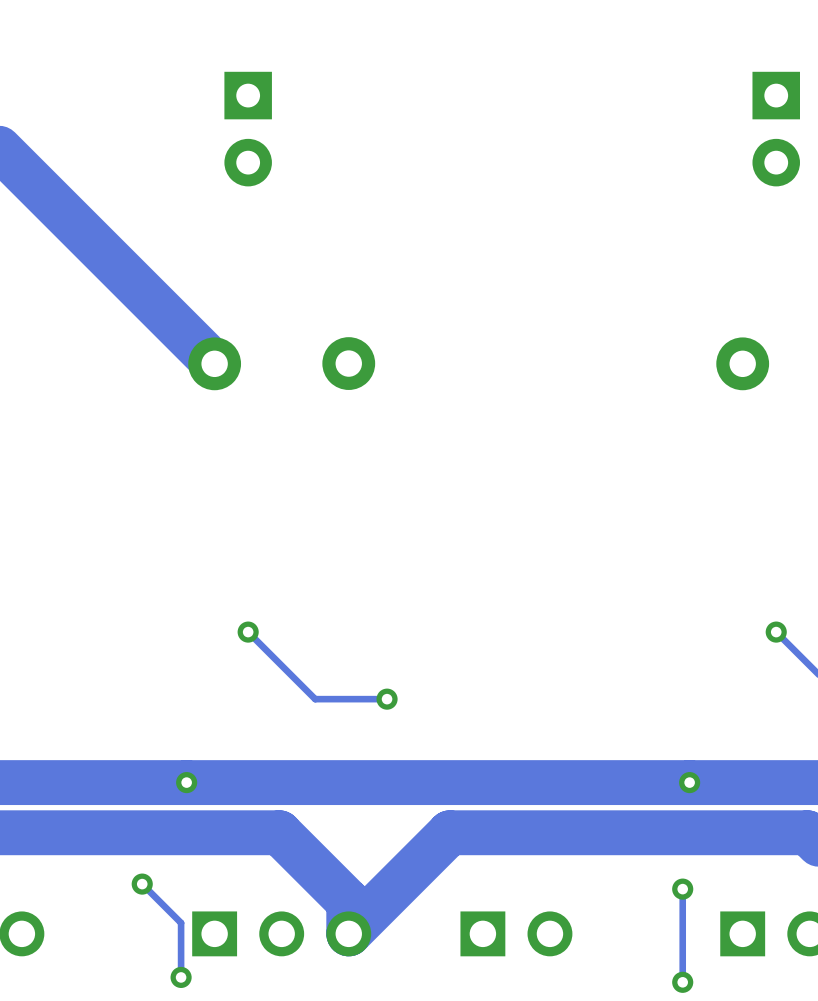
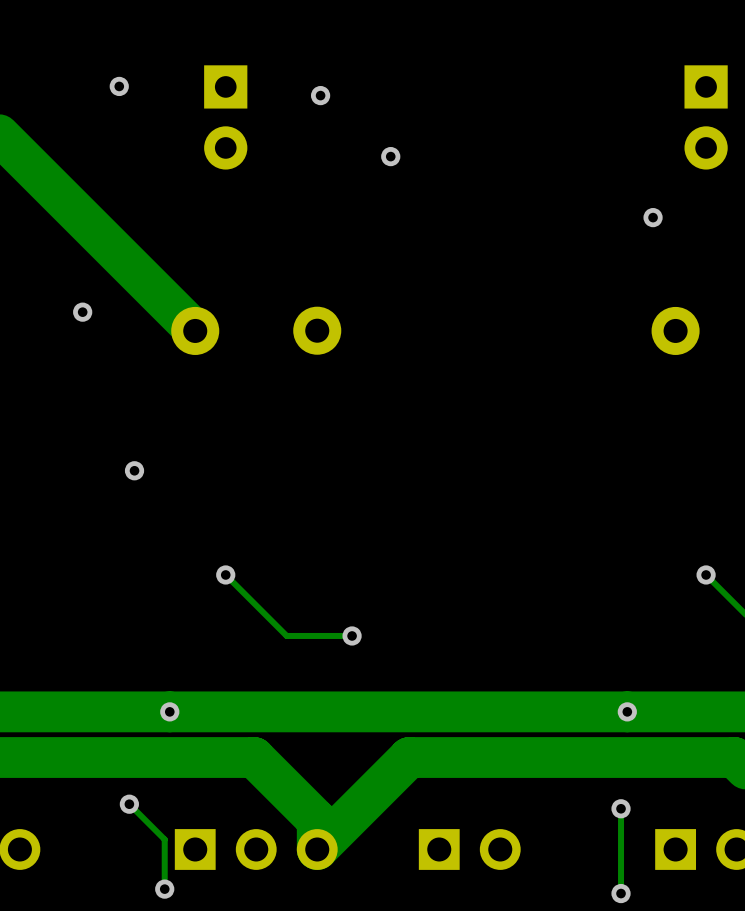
via: none -> (119, 86)
via: none -> (320, 95)
via: none -> (390, 156)
via: none -> (653, 217)
via: none -> (82, 312)
via: none -> (134, 470)

